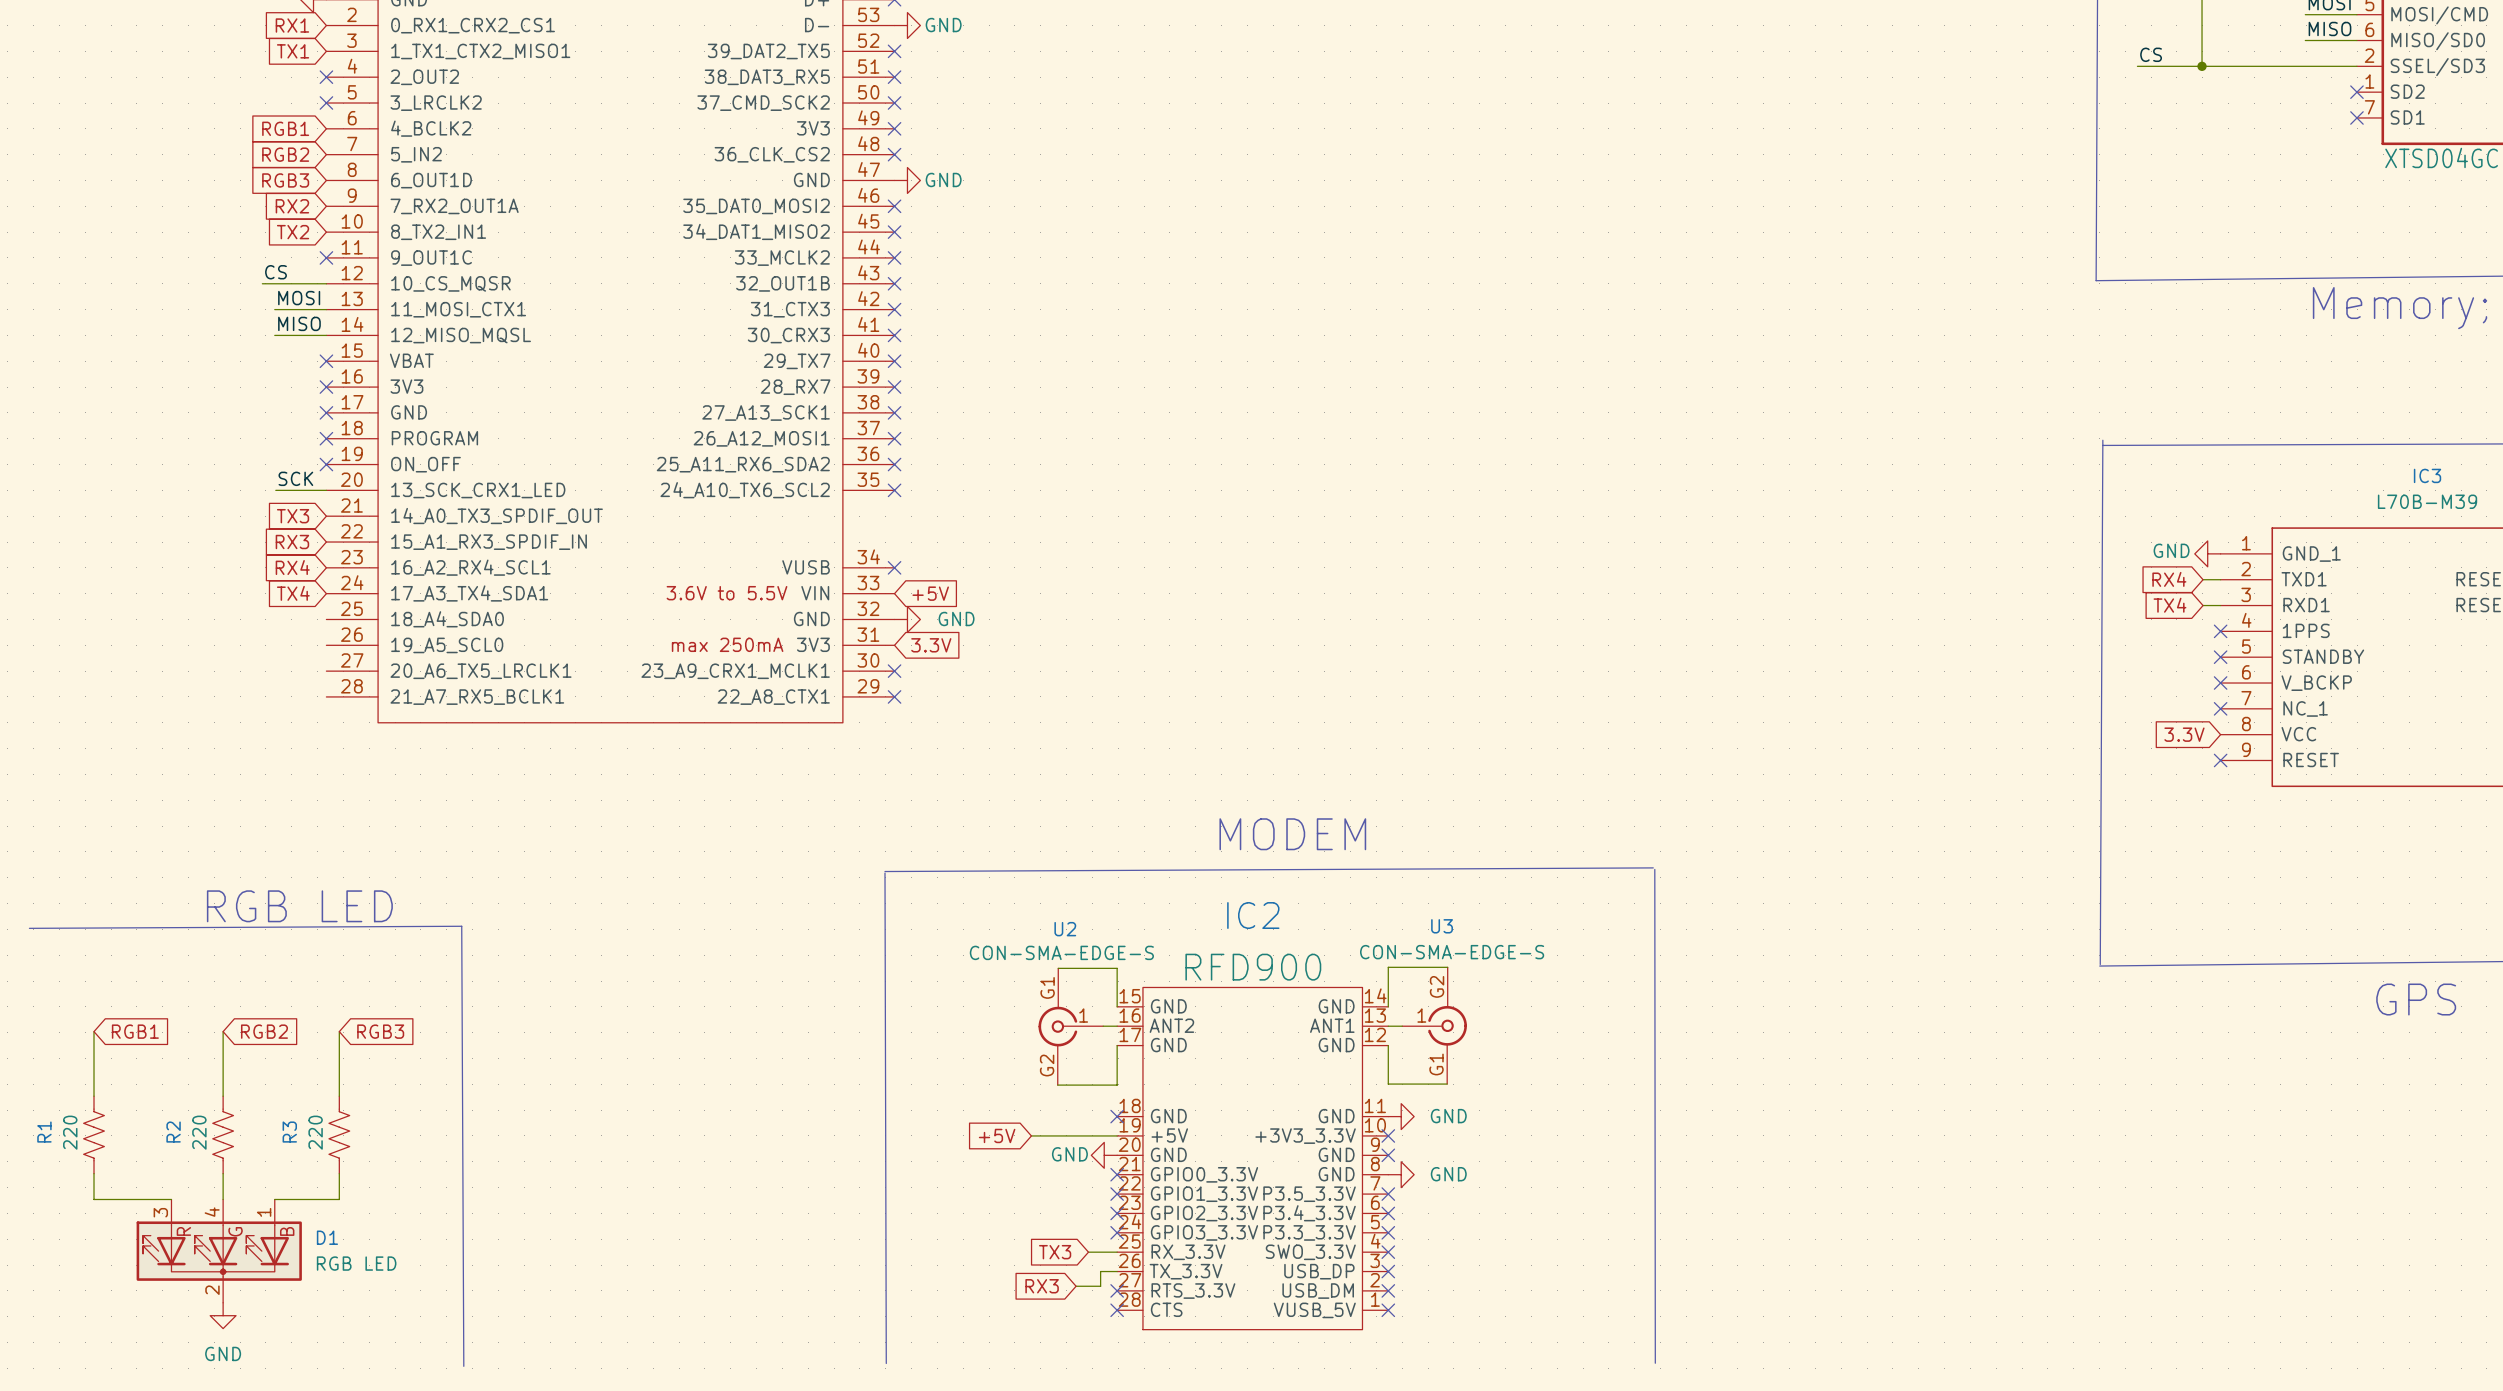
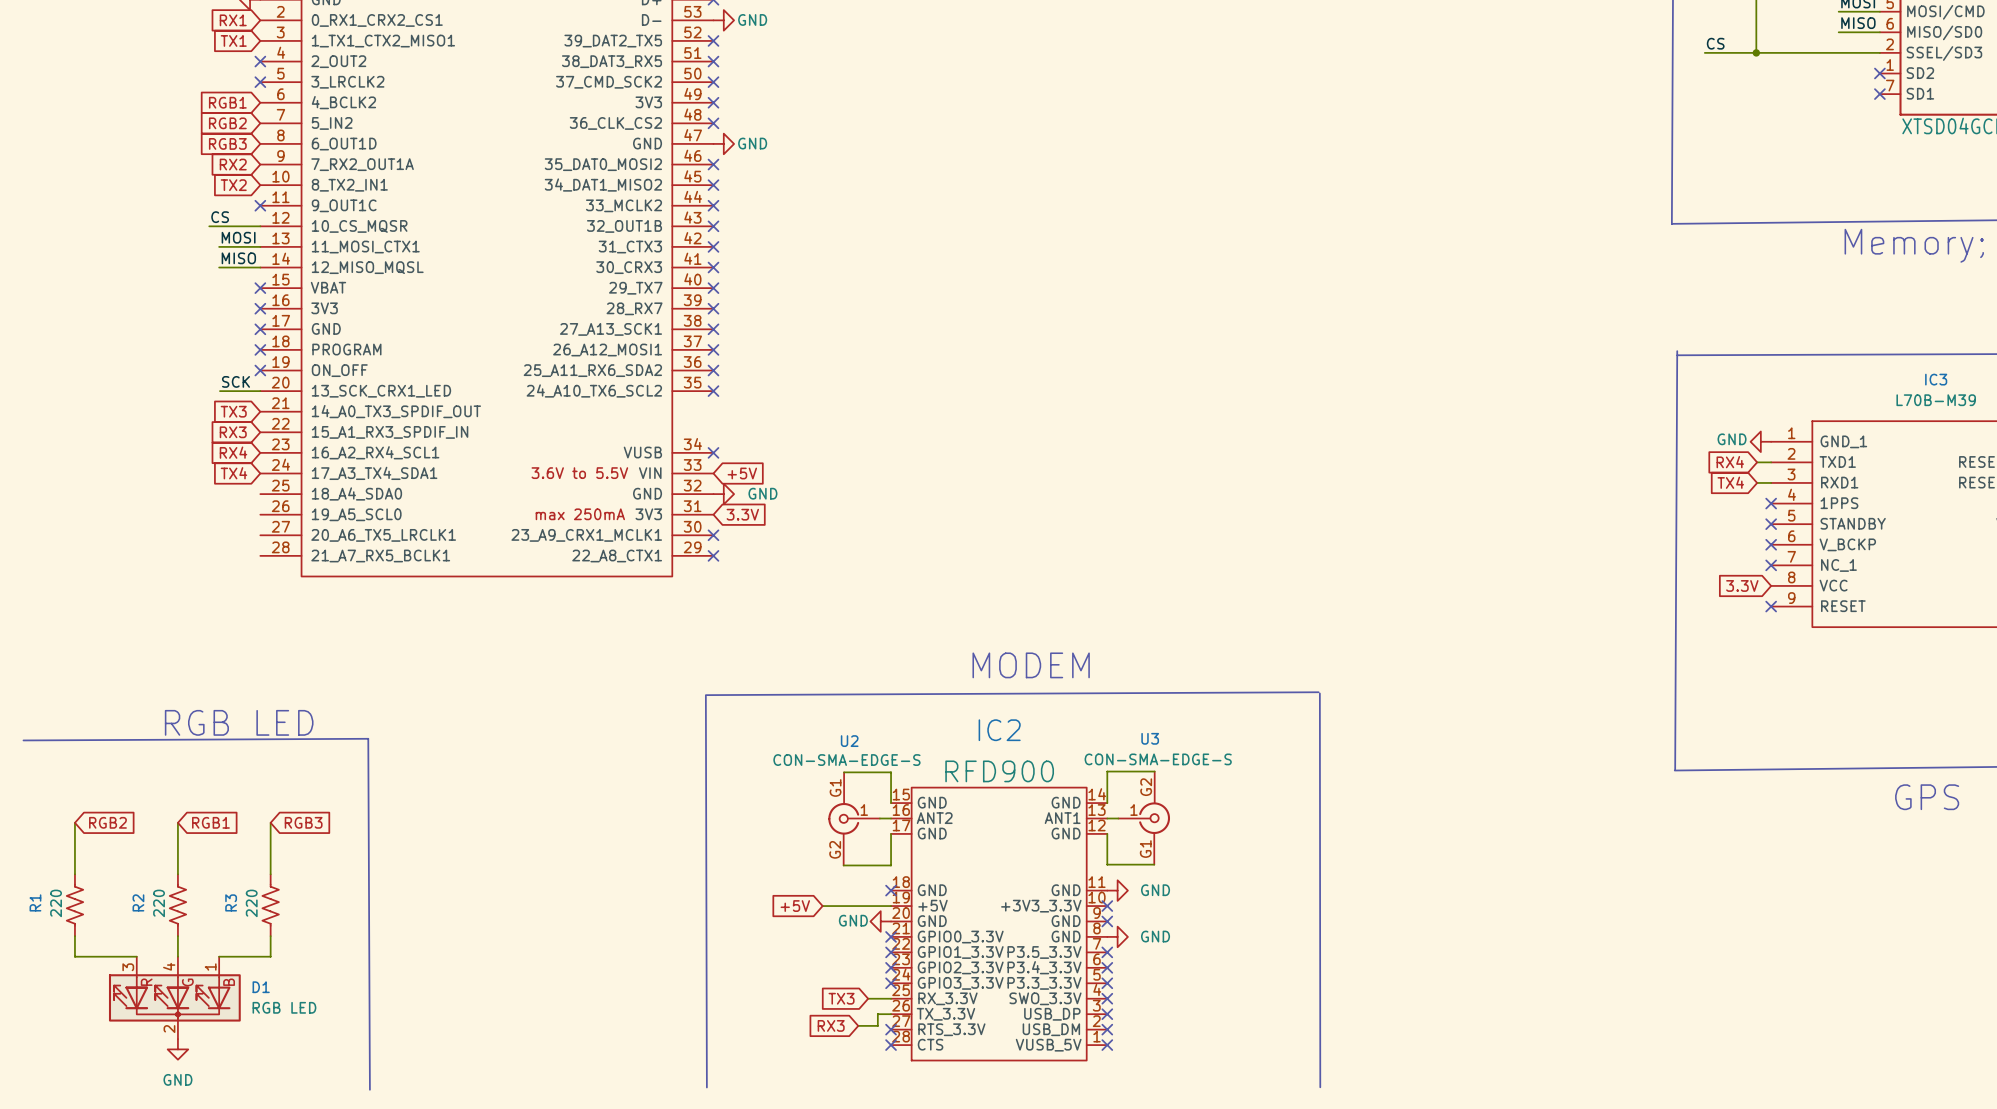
global label: RGB1 (135, 1031) -> RGB2 (107, 822)
global label: RGB2 (264, 1031) -> RGB1 (210, 822)

